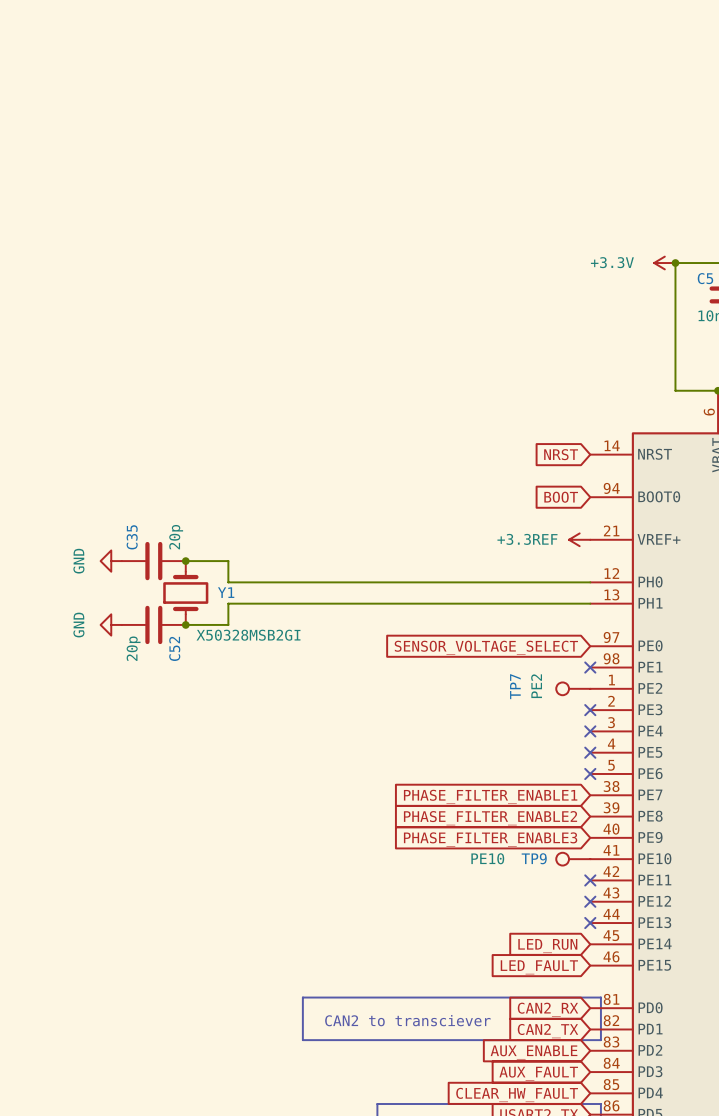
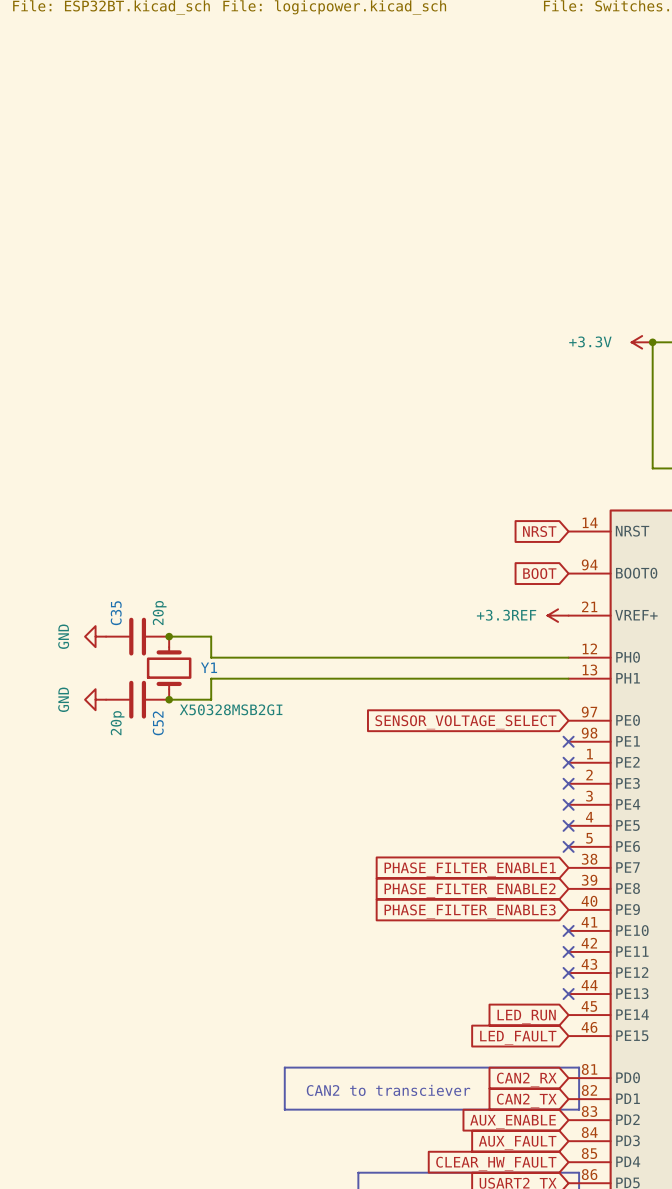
TP7: PE2 (573, 688) -> none
no-connect mark: none -> (568, 762)
TP9: PE10 (573, 859) -> none
no-connect mark: none -> (568, 930)

